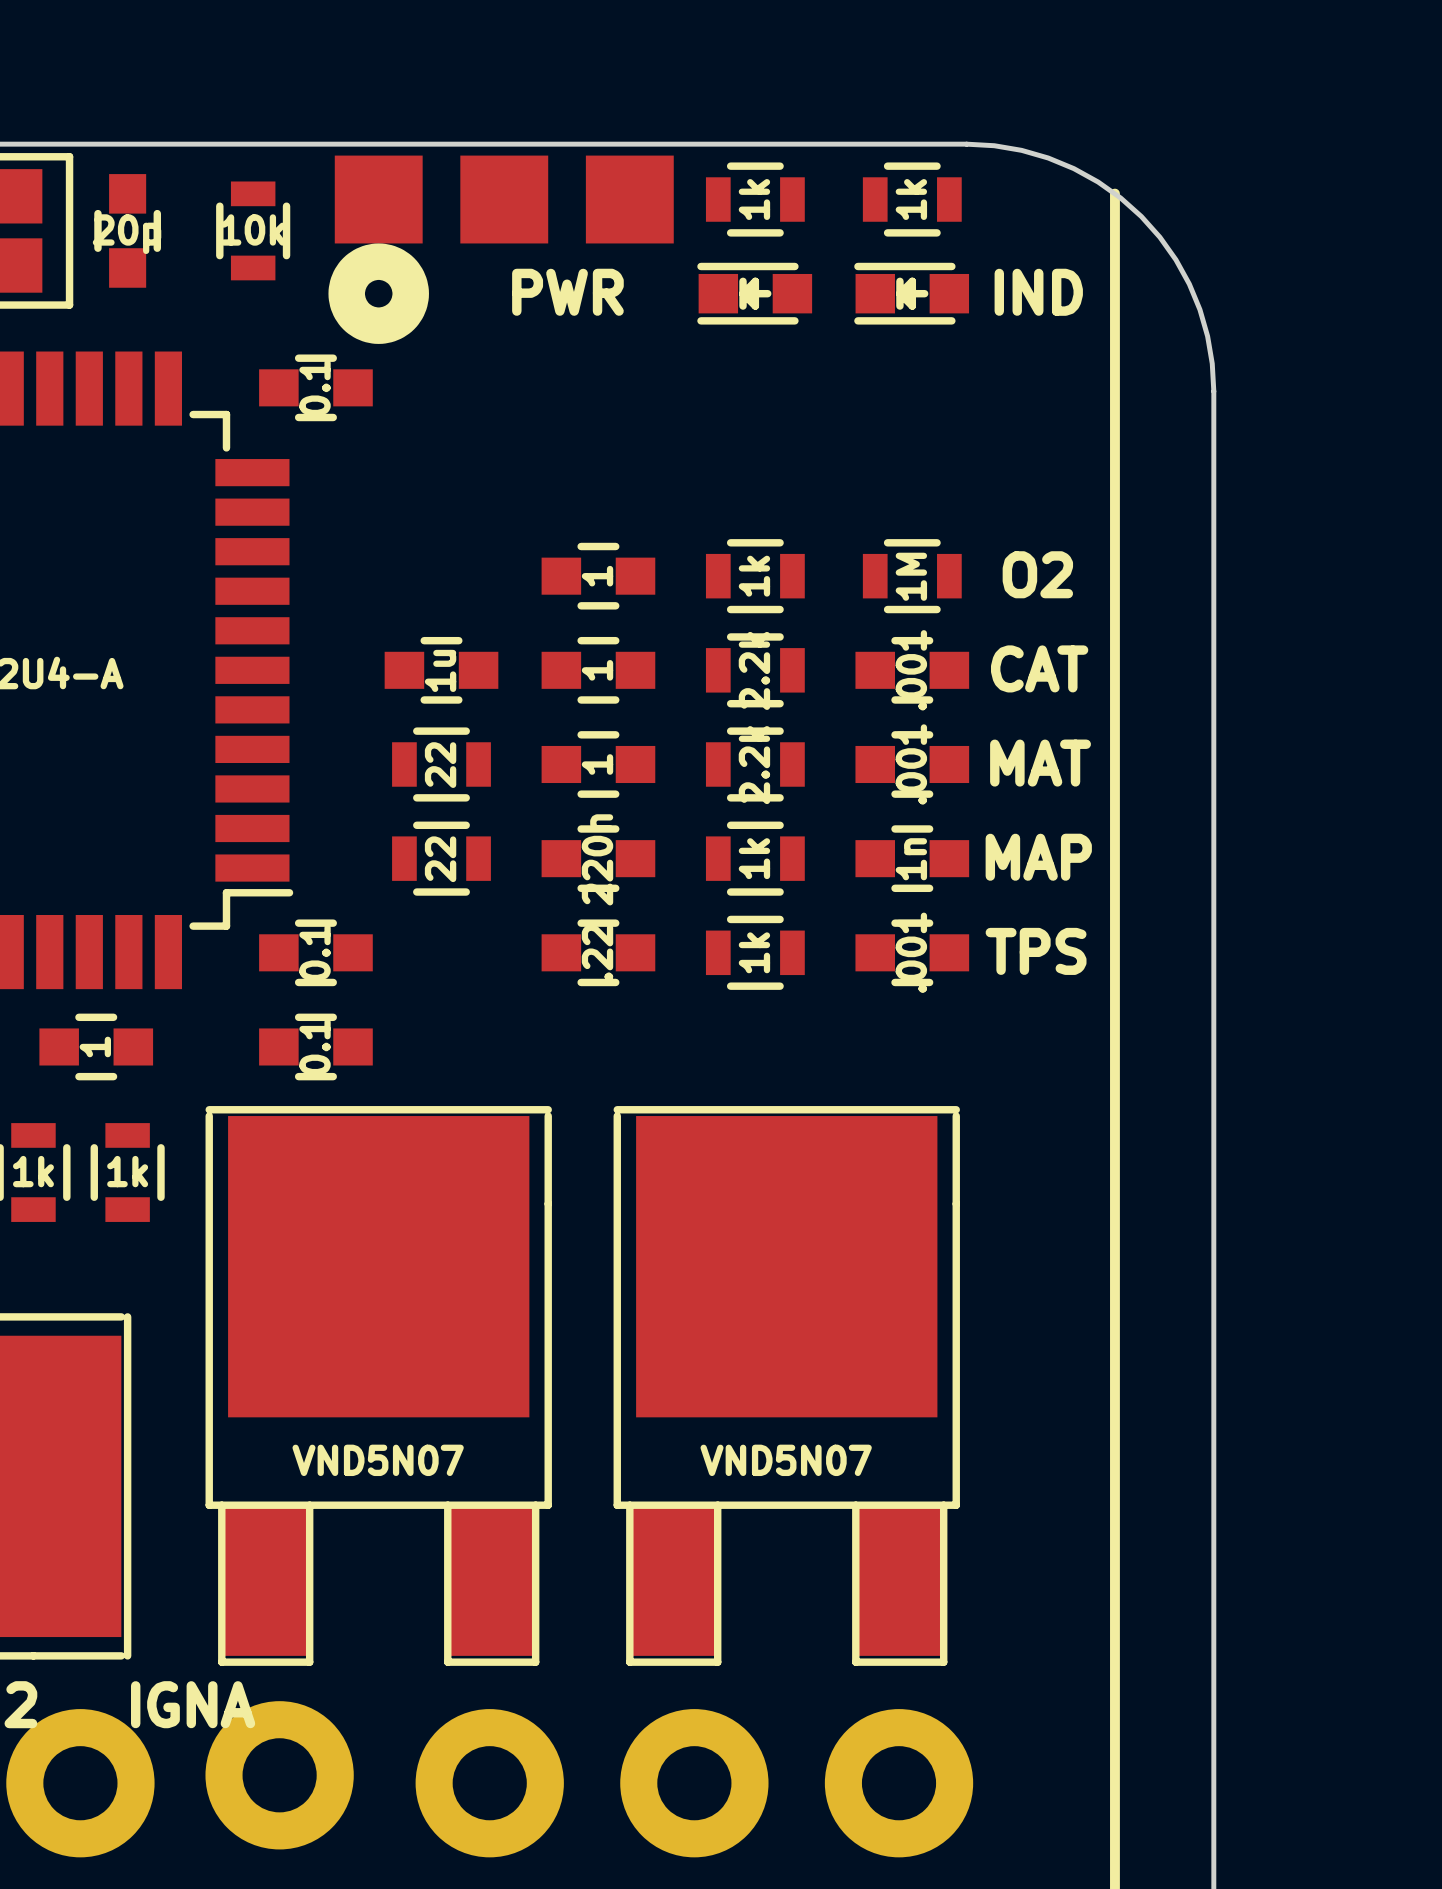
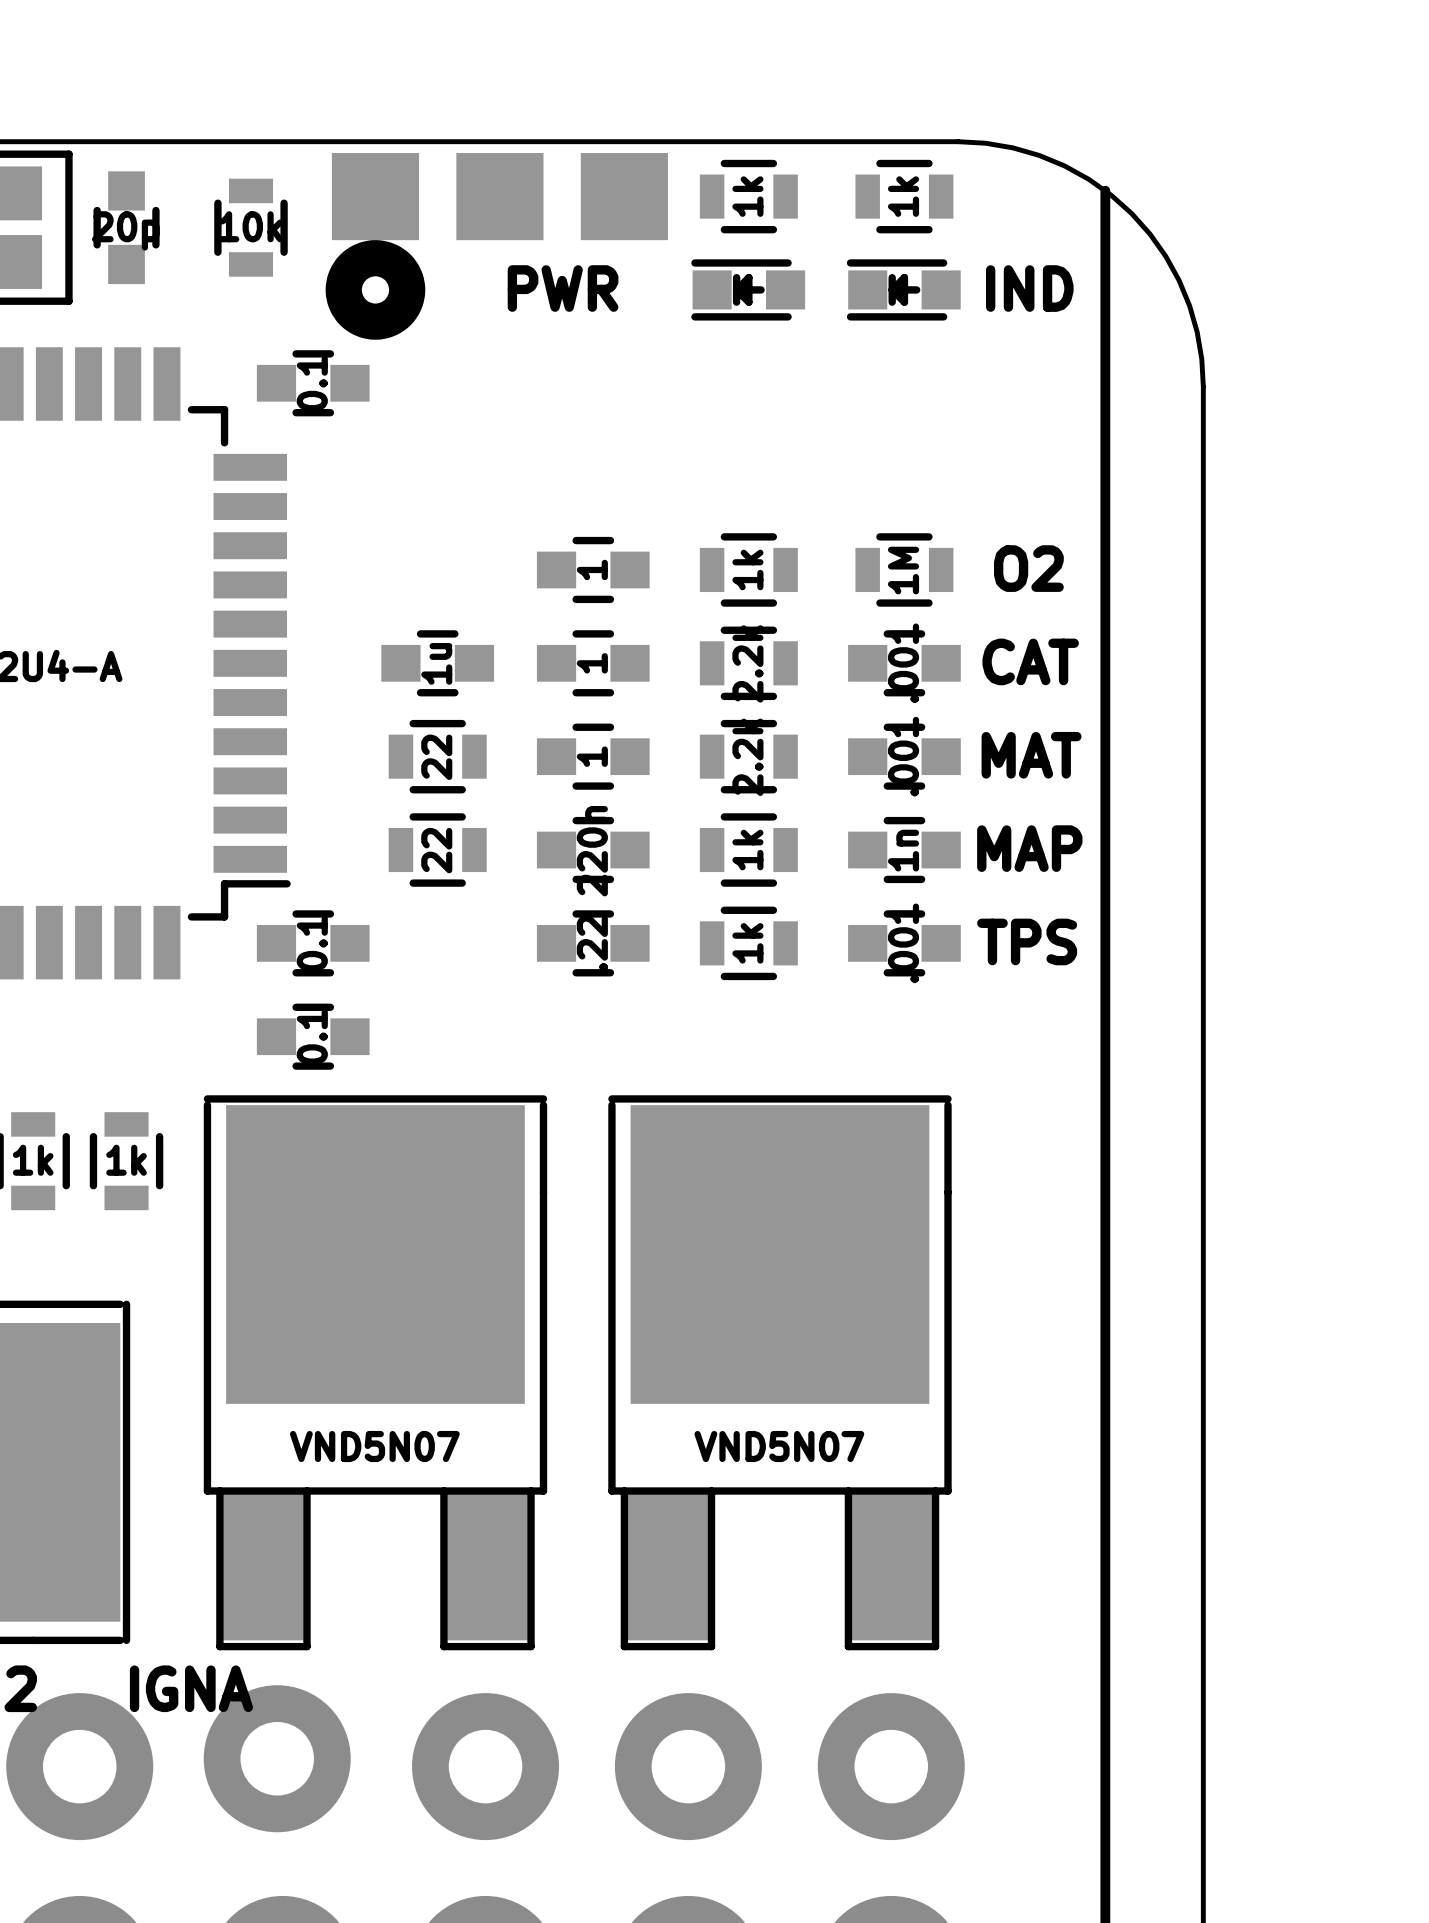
part: 1 (96, 1046) -> none

